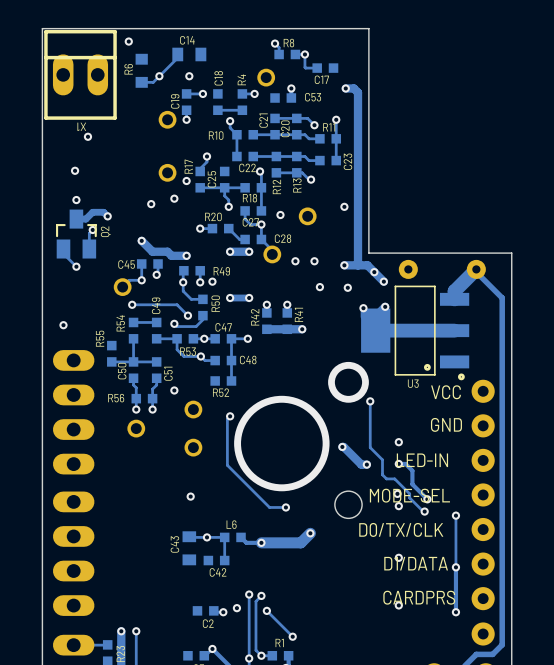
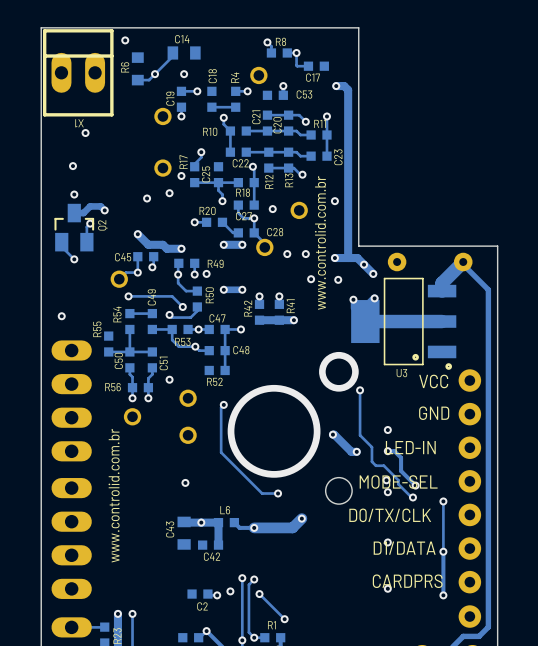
text: none -> www.controlid.com.br (320, 243)
text: none -> www.controlid.com.br (114, 495)
track width: thin (190, 537) (224, 537) (224, 560) -> thick (184, 522) (218, 522) (218, 545)

